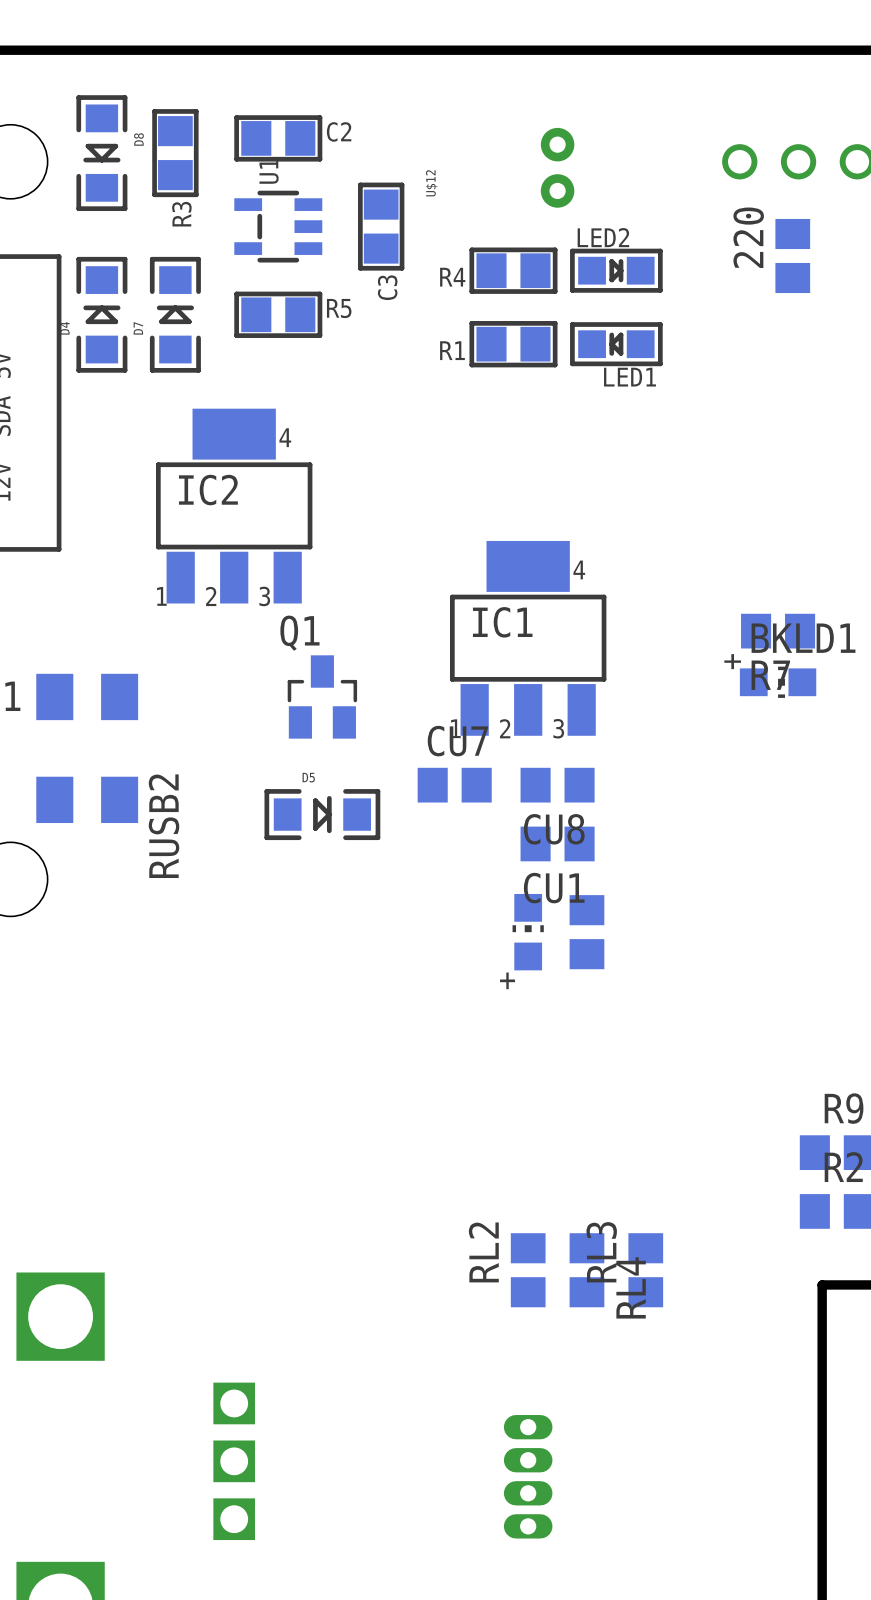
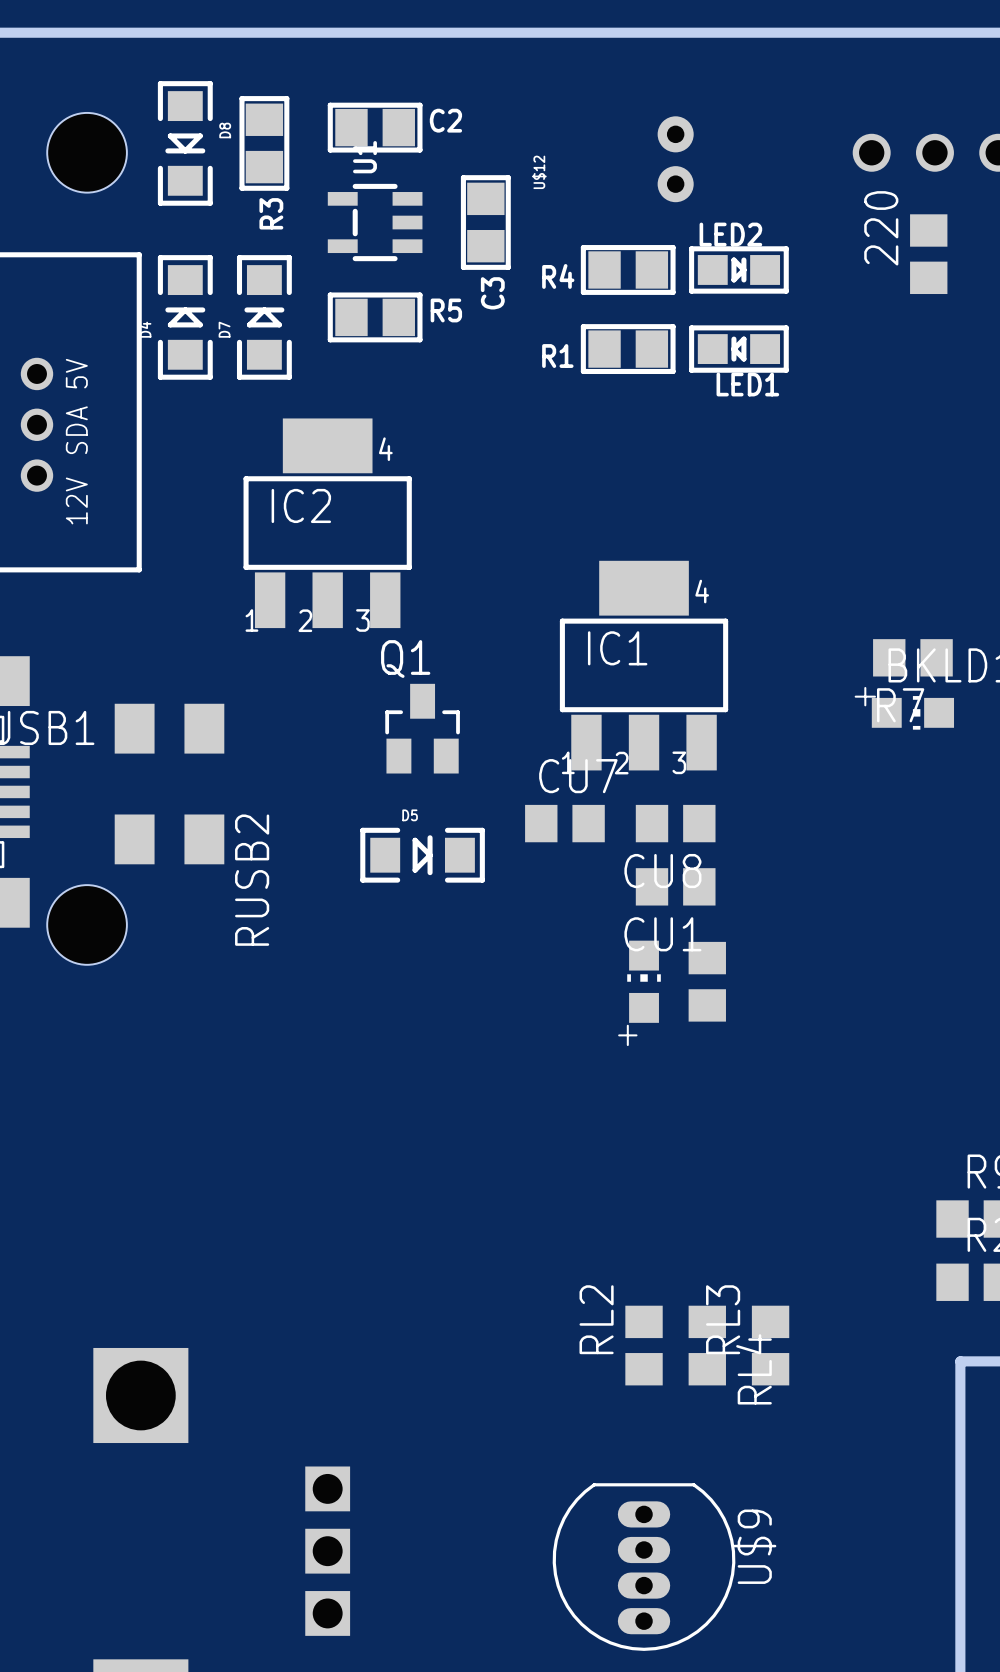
U$9 side: top (528, 1476) -> bottom (644, 1567)

